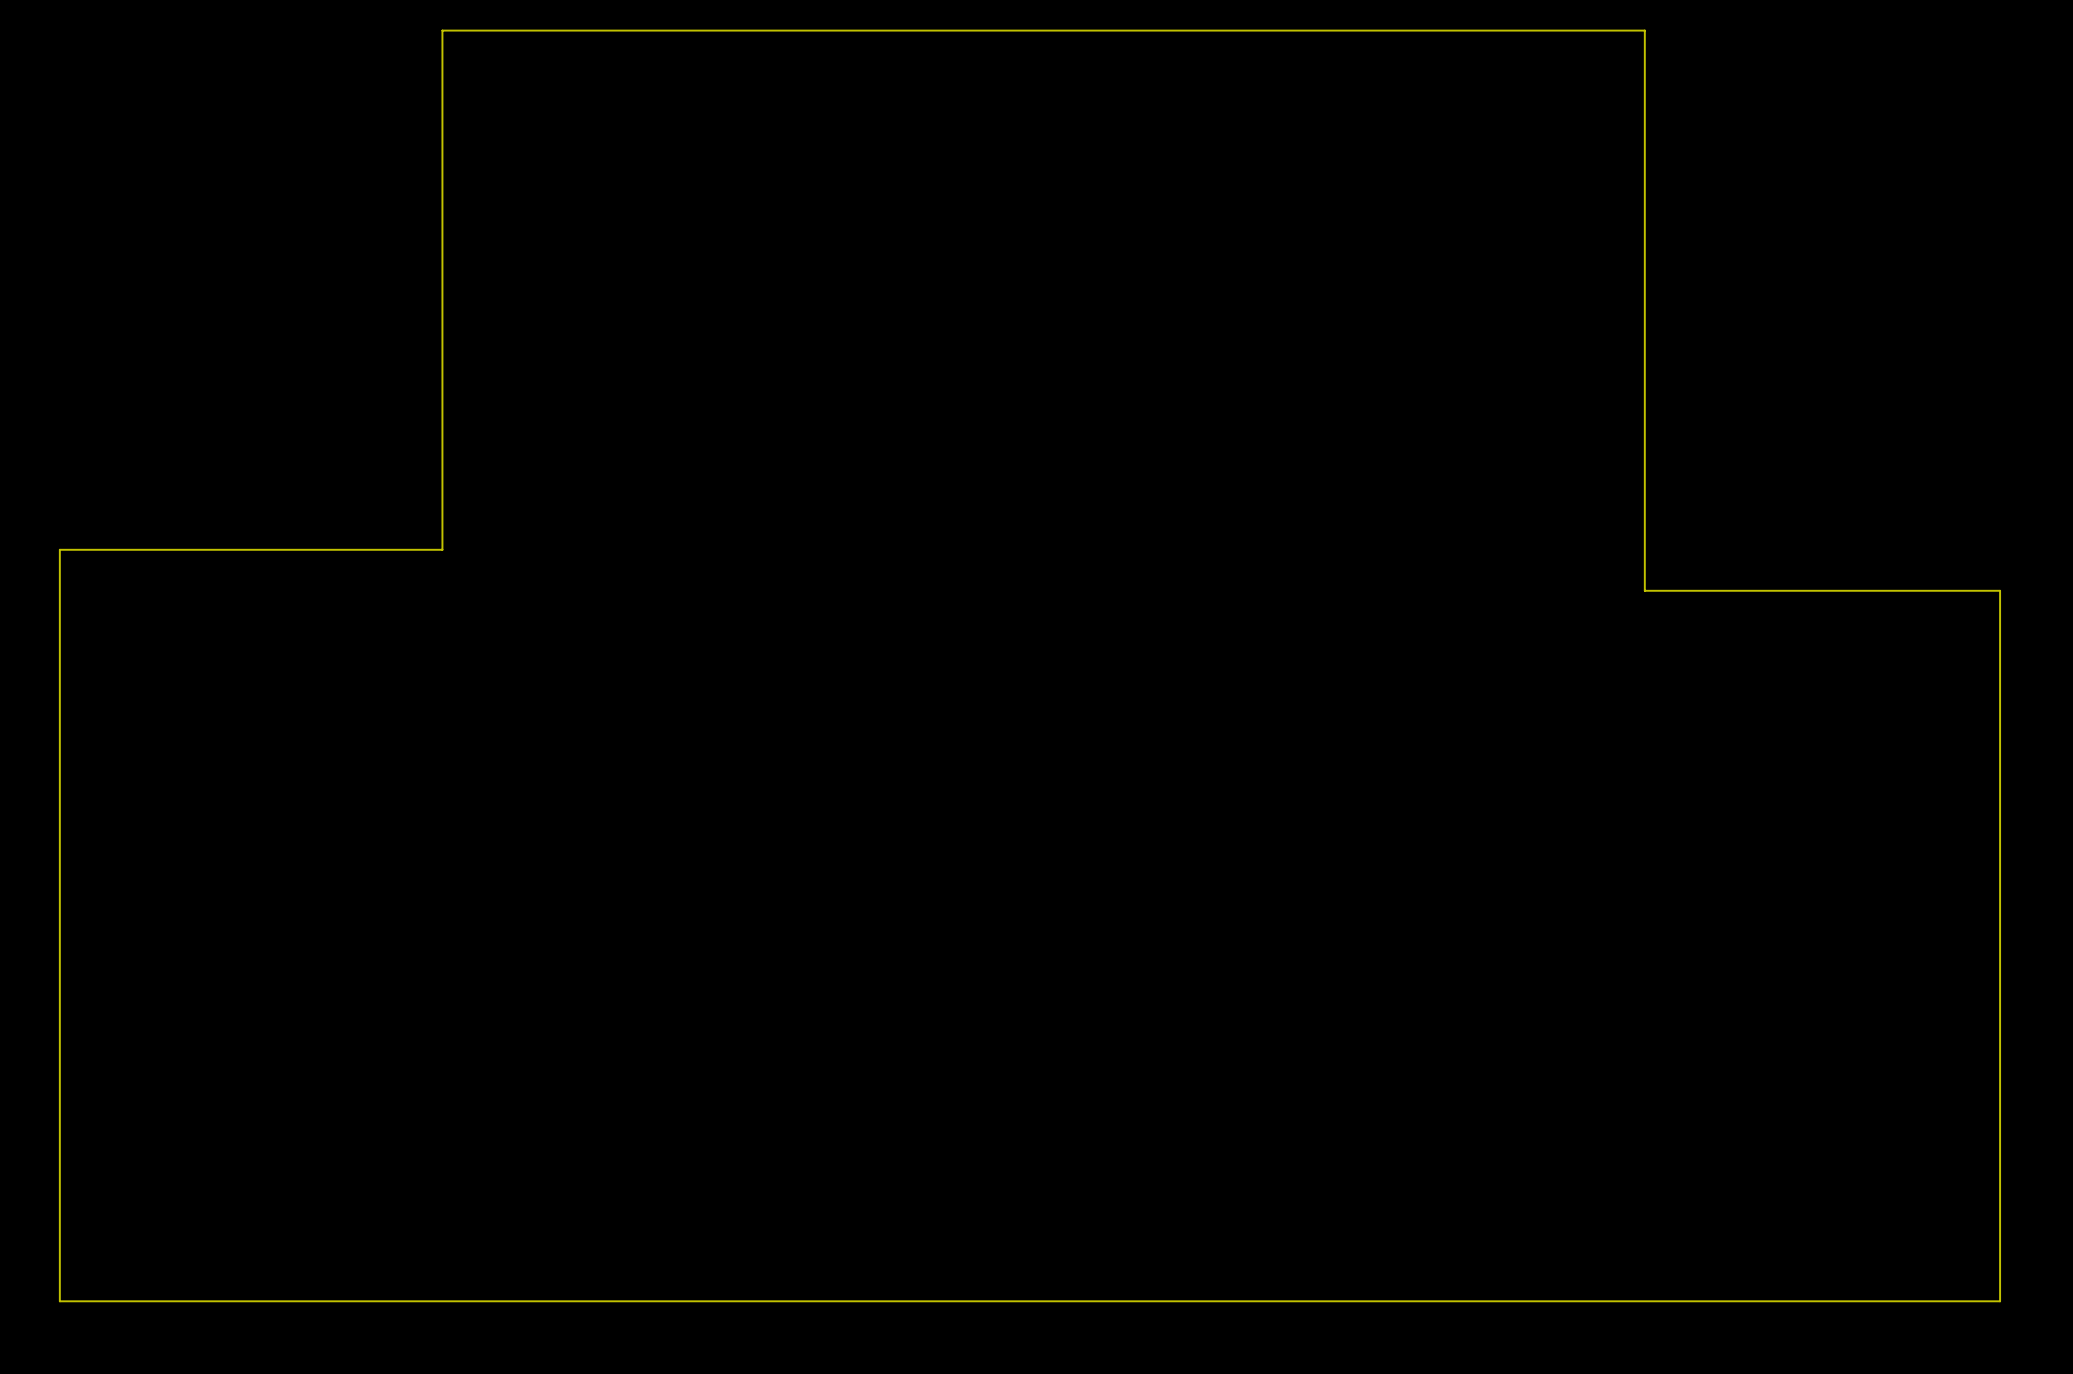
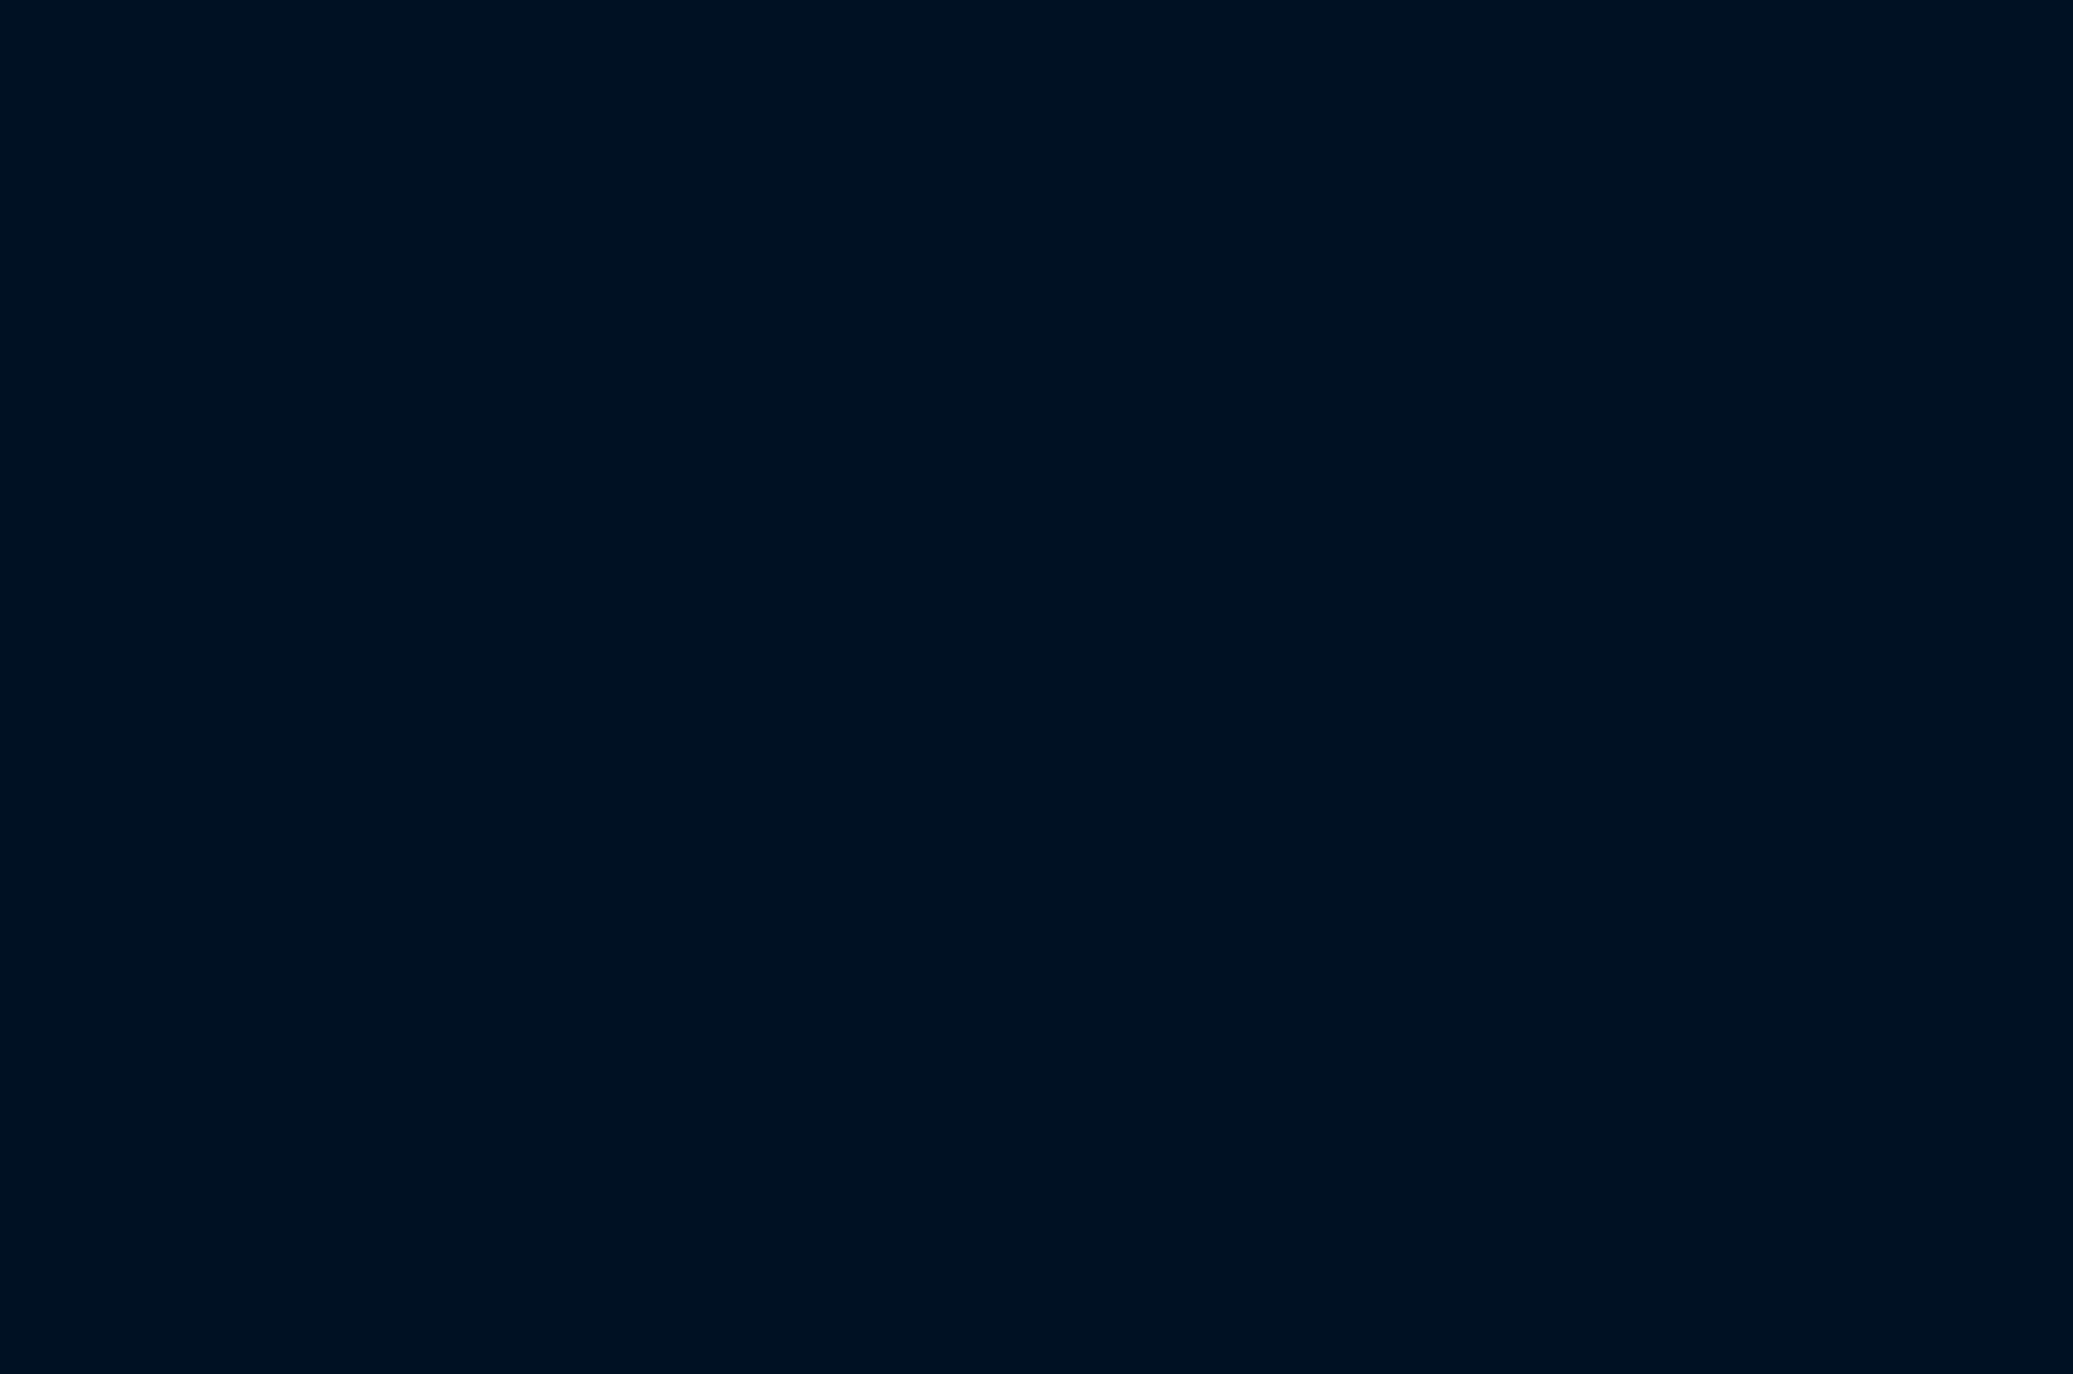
board edge: (442, 30) (442, 549) (59, 549) (59, 1301) (2000, 1301) (2000, 590) (1644, 590) (1644, 30) (442, 30) -> none

